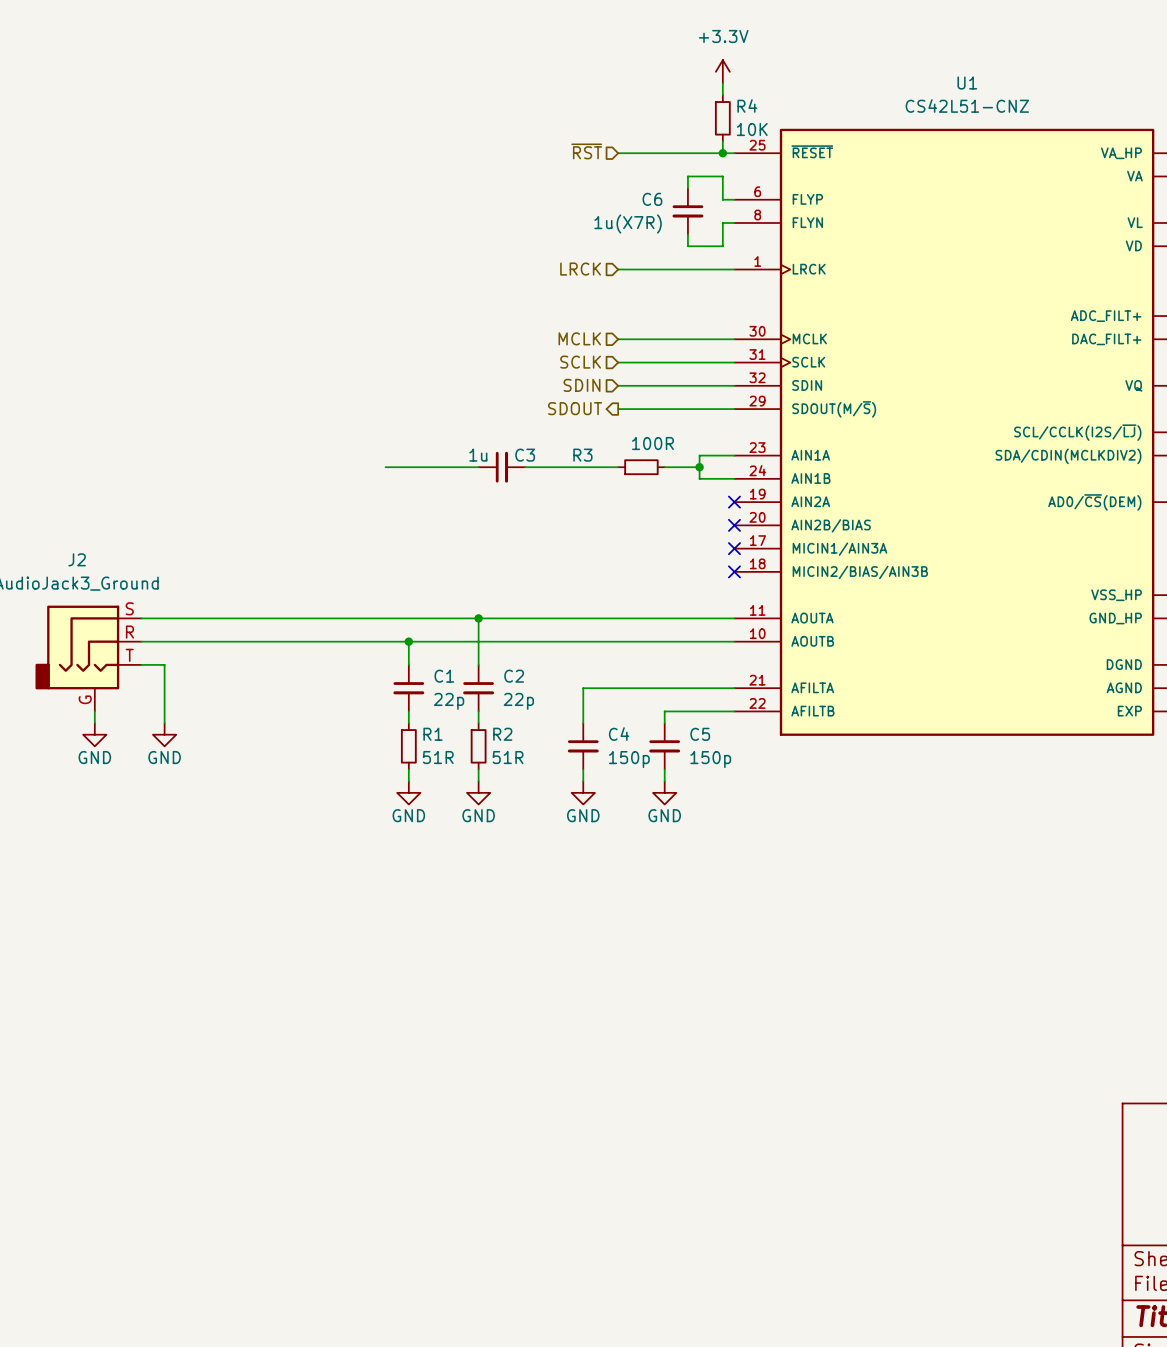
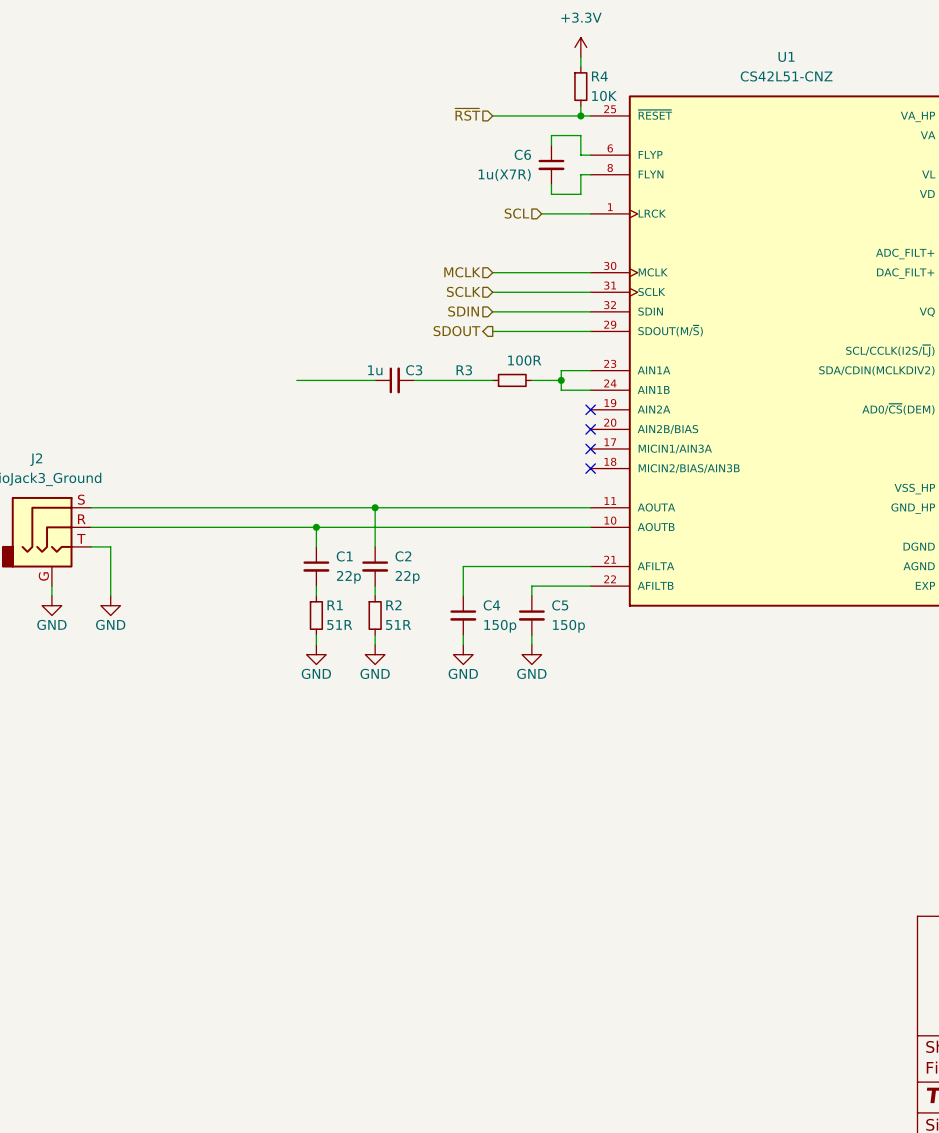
hierarchical label: LRCK (580, 269) -> none
wire: (618, 269) (676, 269) -> none
hierarchical label: none -> SCL (516, 213)

